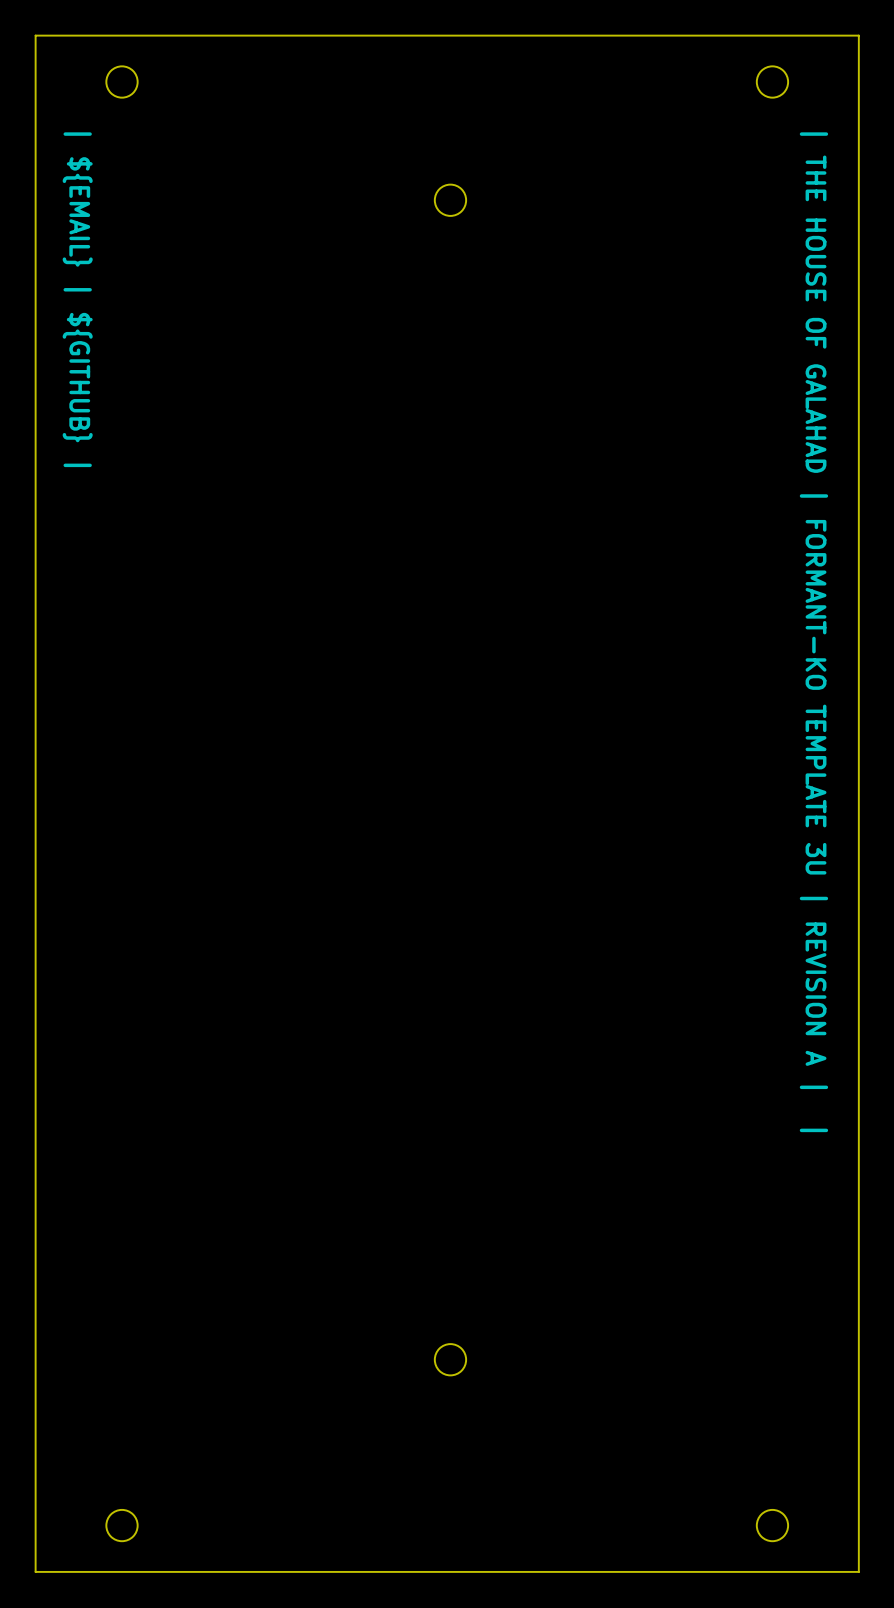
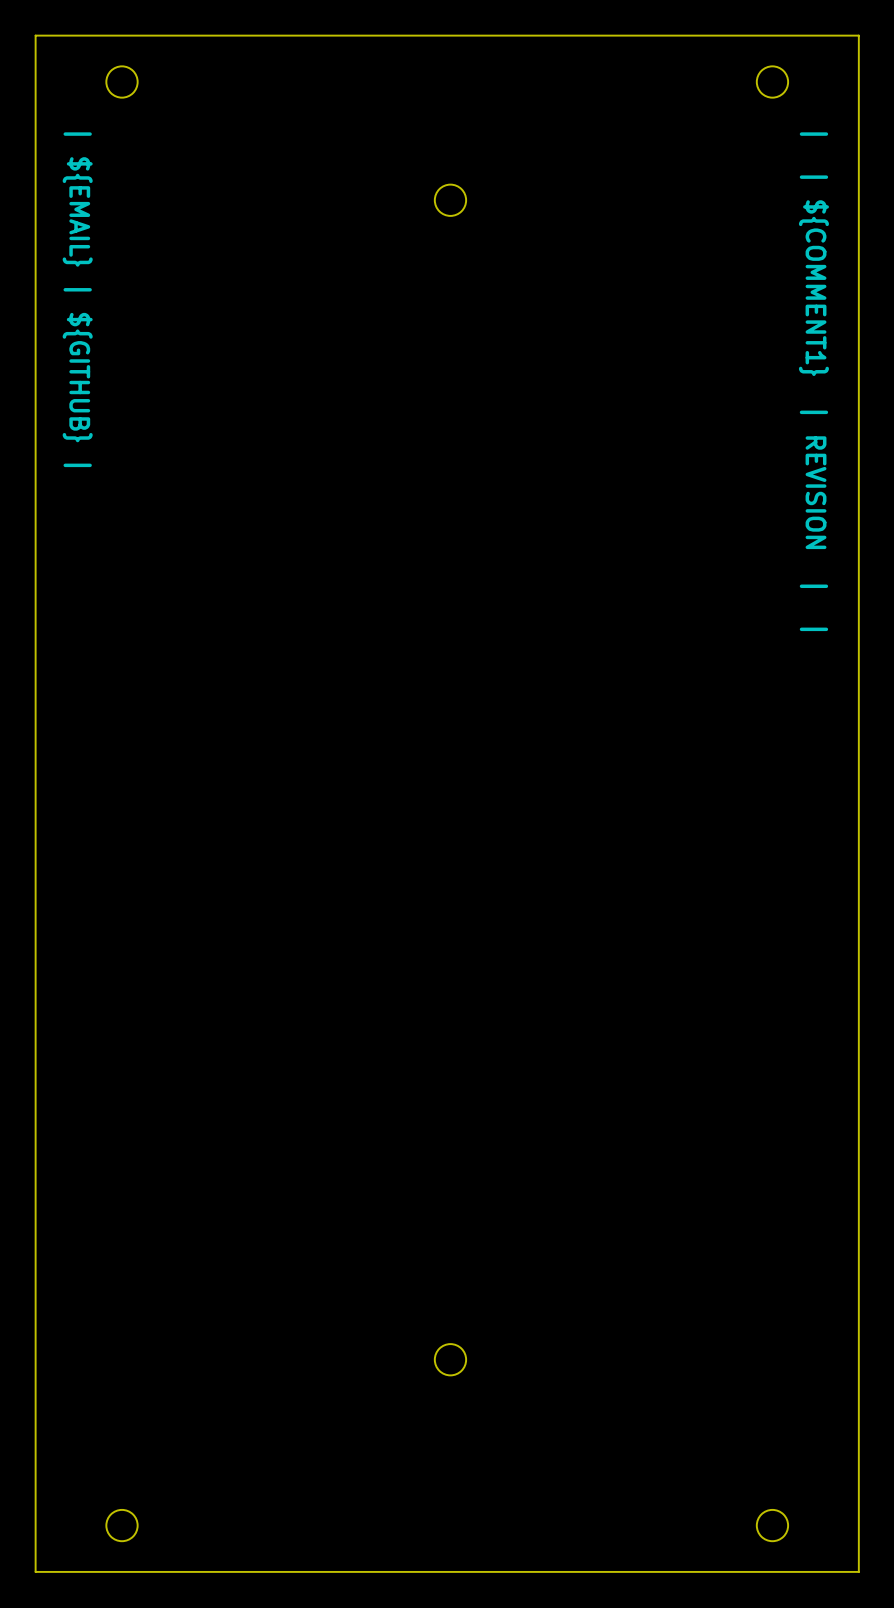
text: | THE HOUSE OF GALAHAD | FORMANT-KO TEMPLATE 3U | REVISION A | | (813, 632) -> | | ${COMMENT1} | REVISION | | (813, 381)

